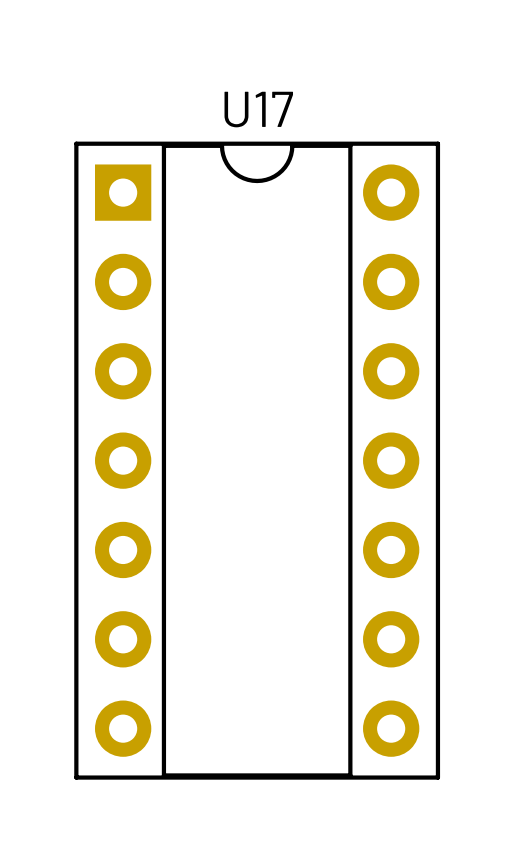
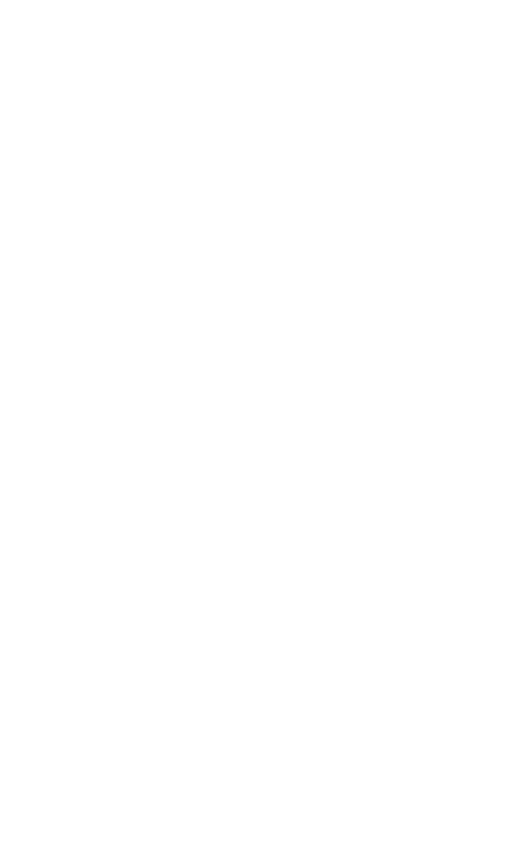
U17: (257, 460) -> none

